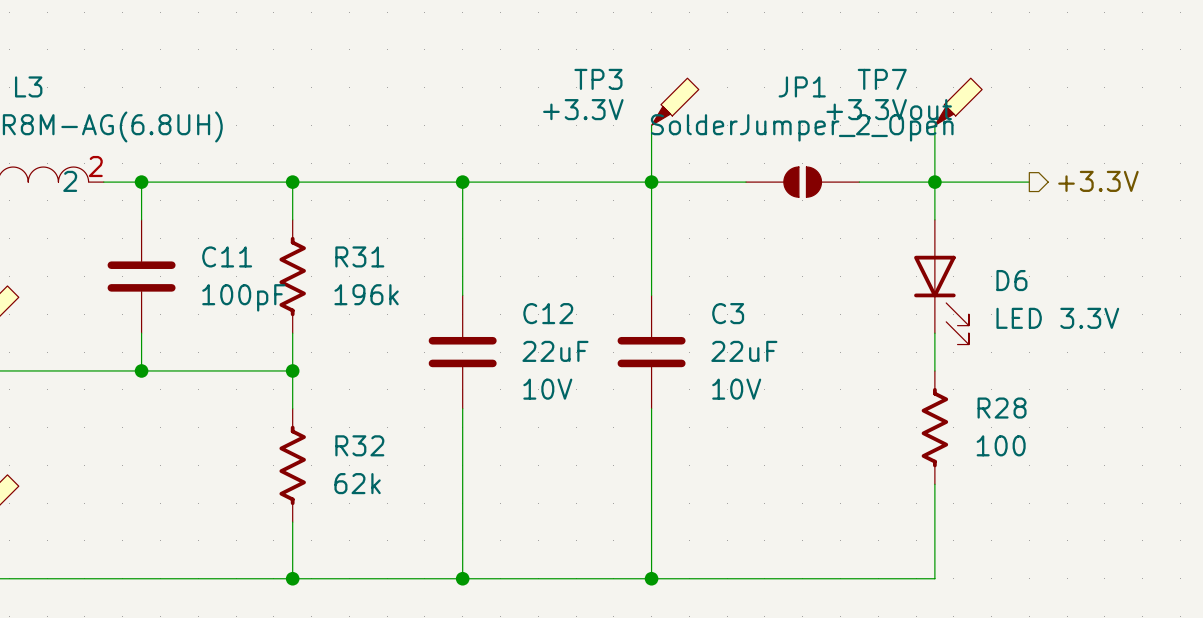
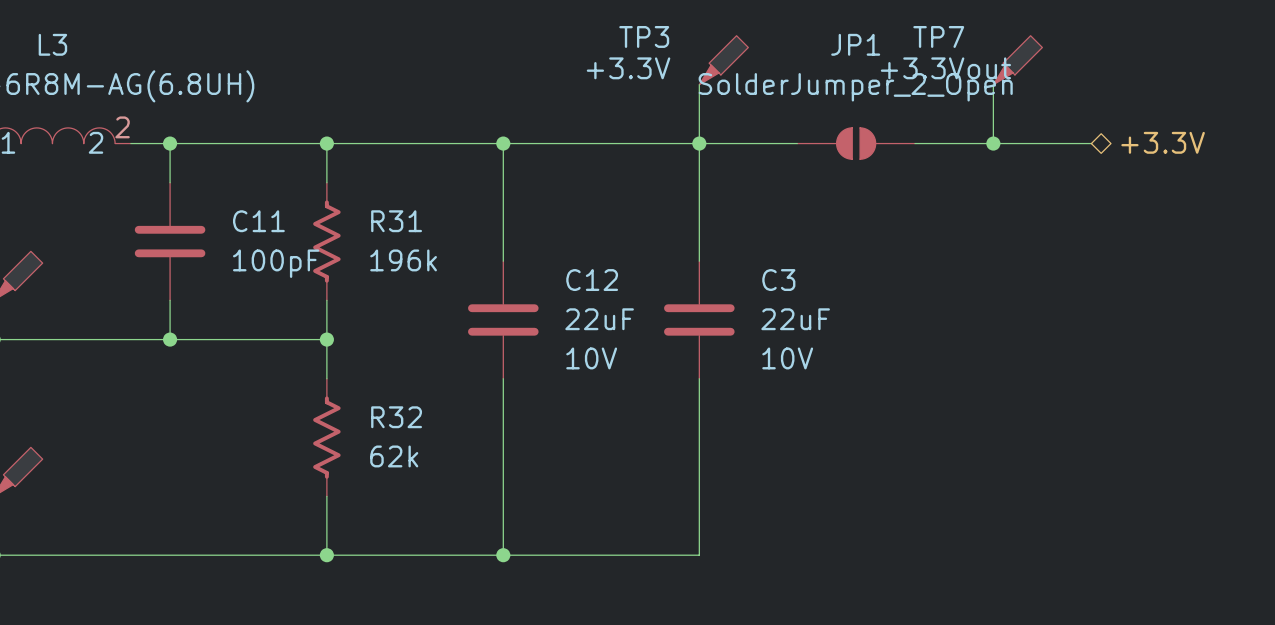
hierarchical label shape: output (1098, 181) -> bidirectional (1163, 142)
wire: (934, 182) (934, 219) -> none
D6: LED 3.3V (941, 282) -> none
wire: (934, 333) (934, 370) -> none
R28: 100 (934, 427) -> none
wire: (934, 484) (934, 578) (651, 578) -> none
junction: (651, 578) -> none

